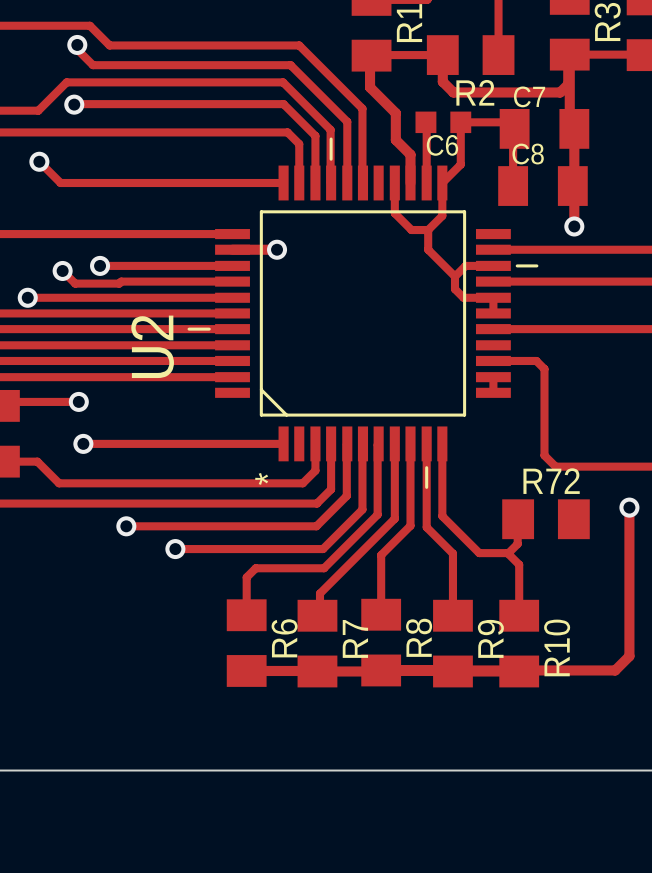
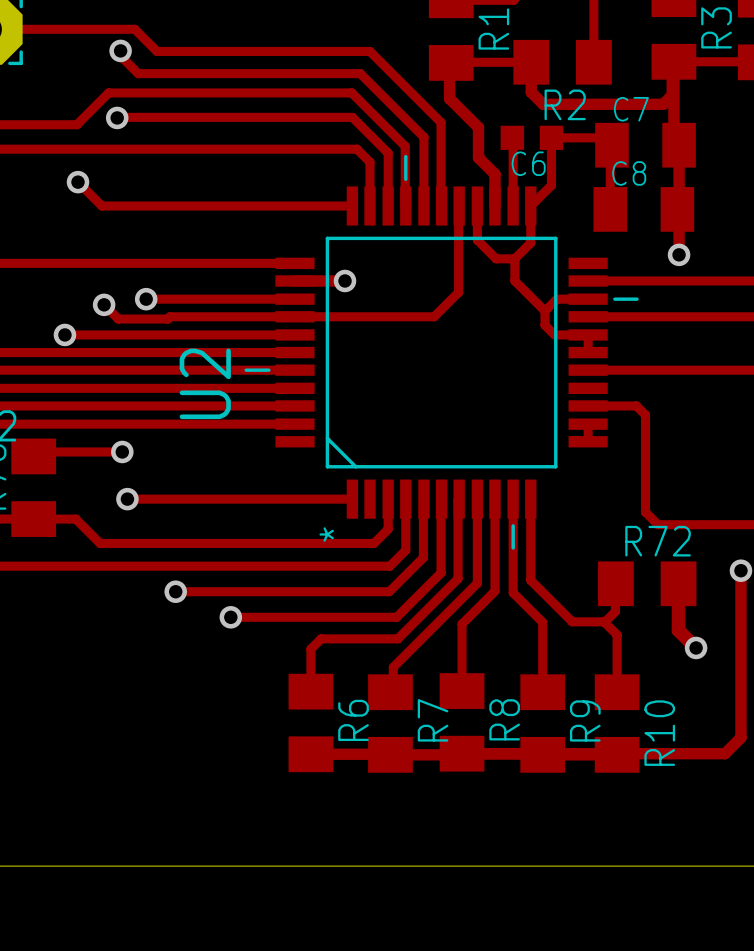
track: none -> (459, 206) (458, 292) (434, 316) (295, 316)
track: none -> (678, 583) (678, 630) (696, 647)
via: none -> (696, 647)

